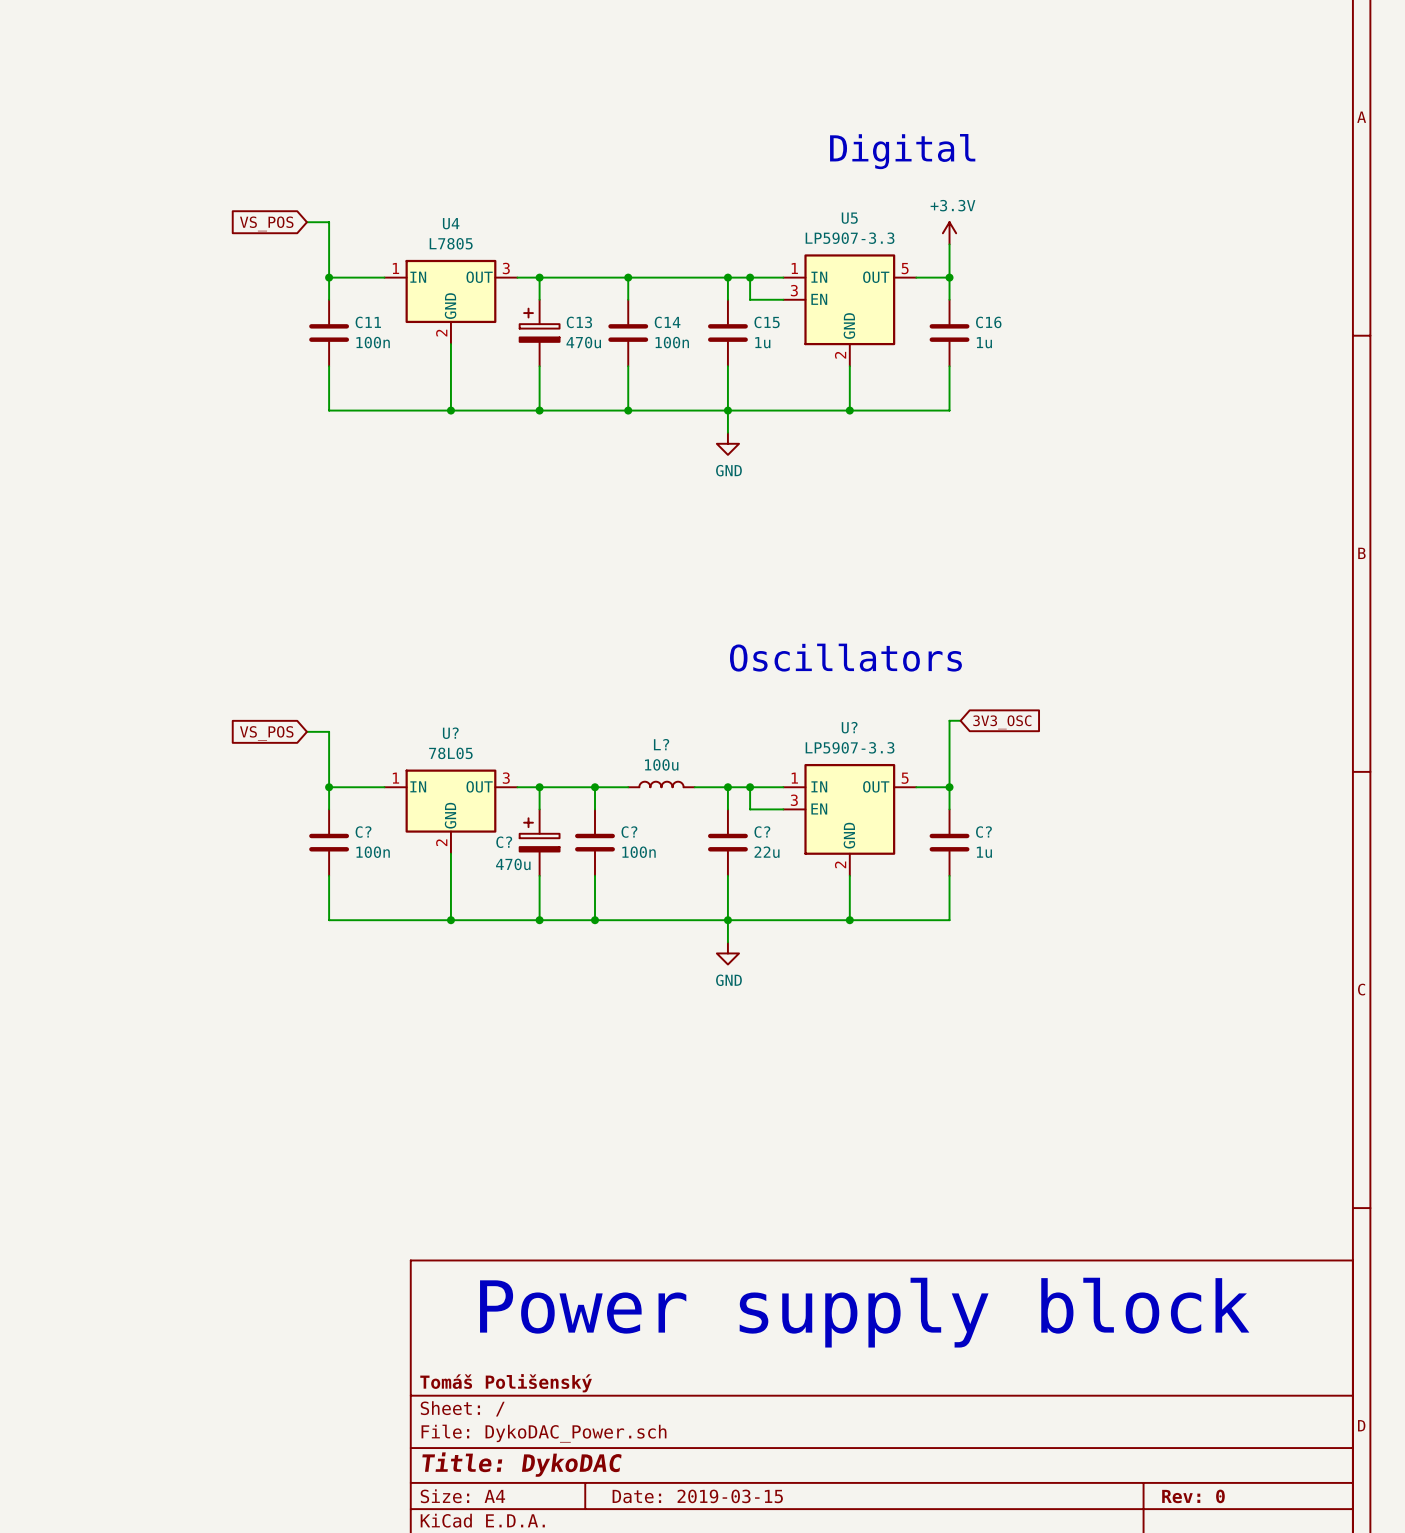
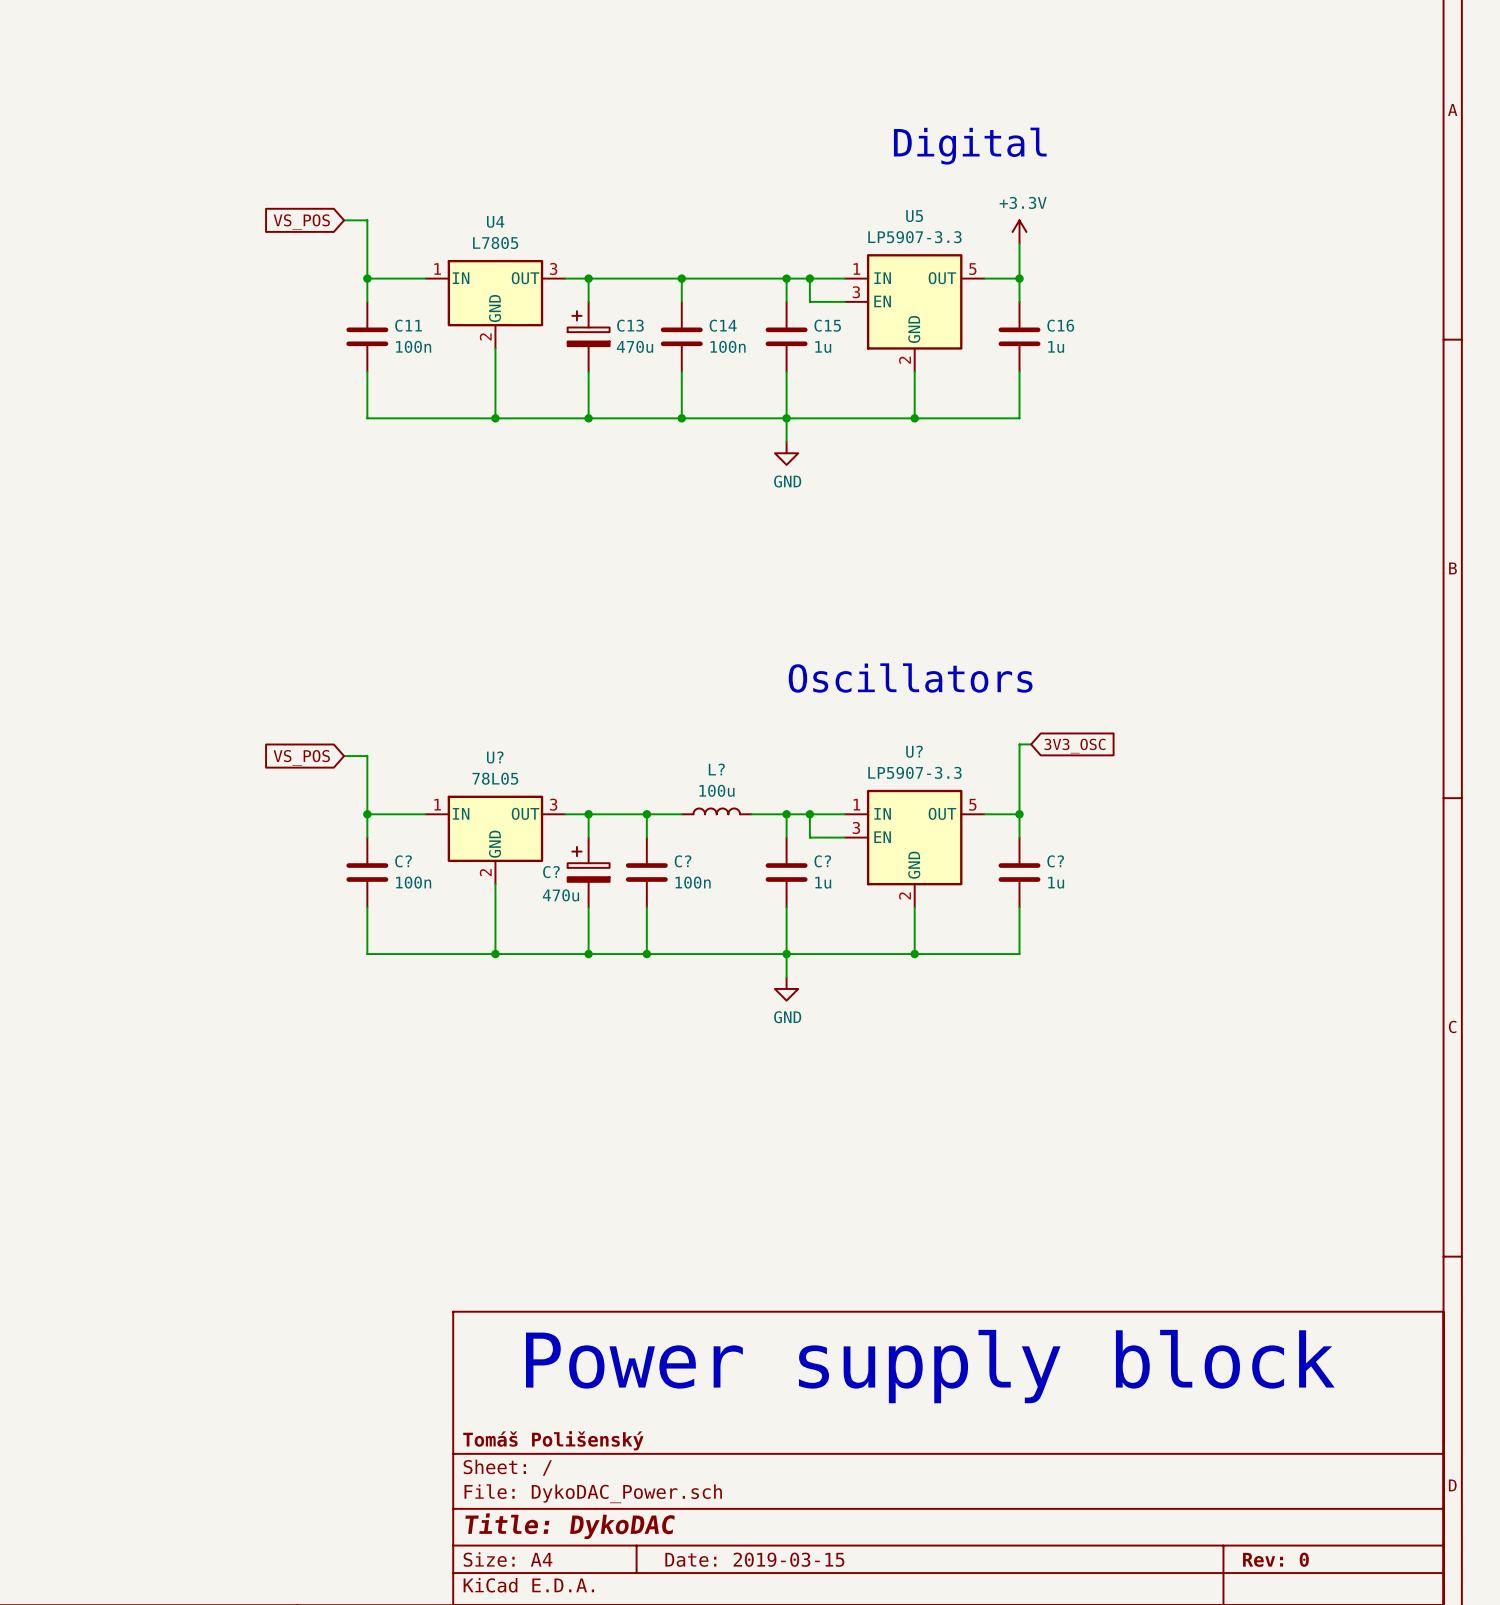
C? value: 22u (767, 852) -> 1u (823, 882)

